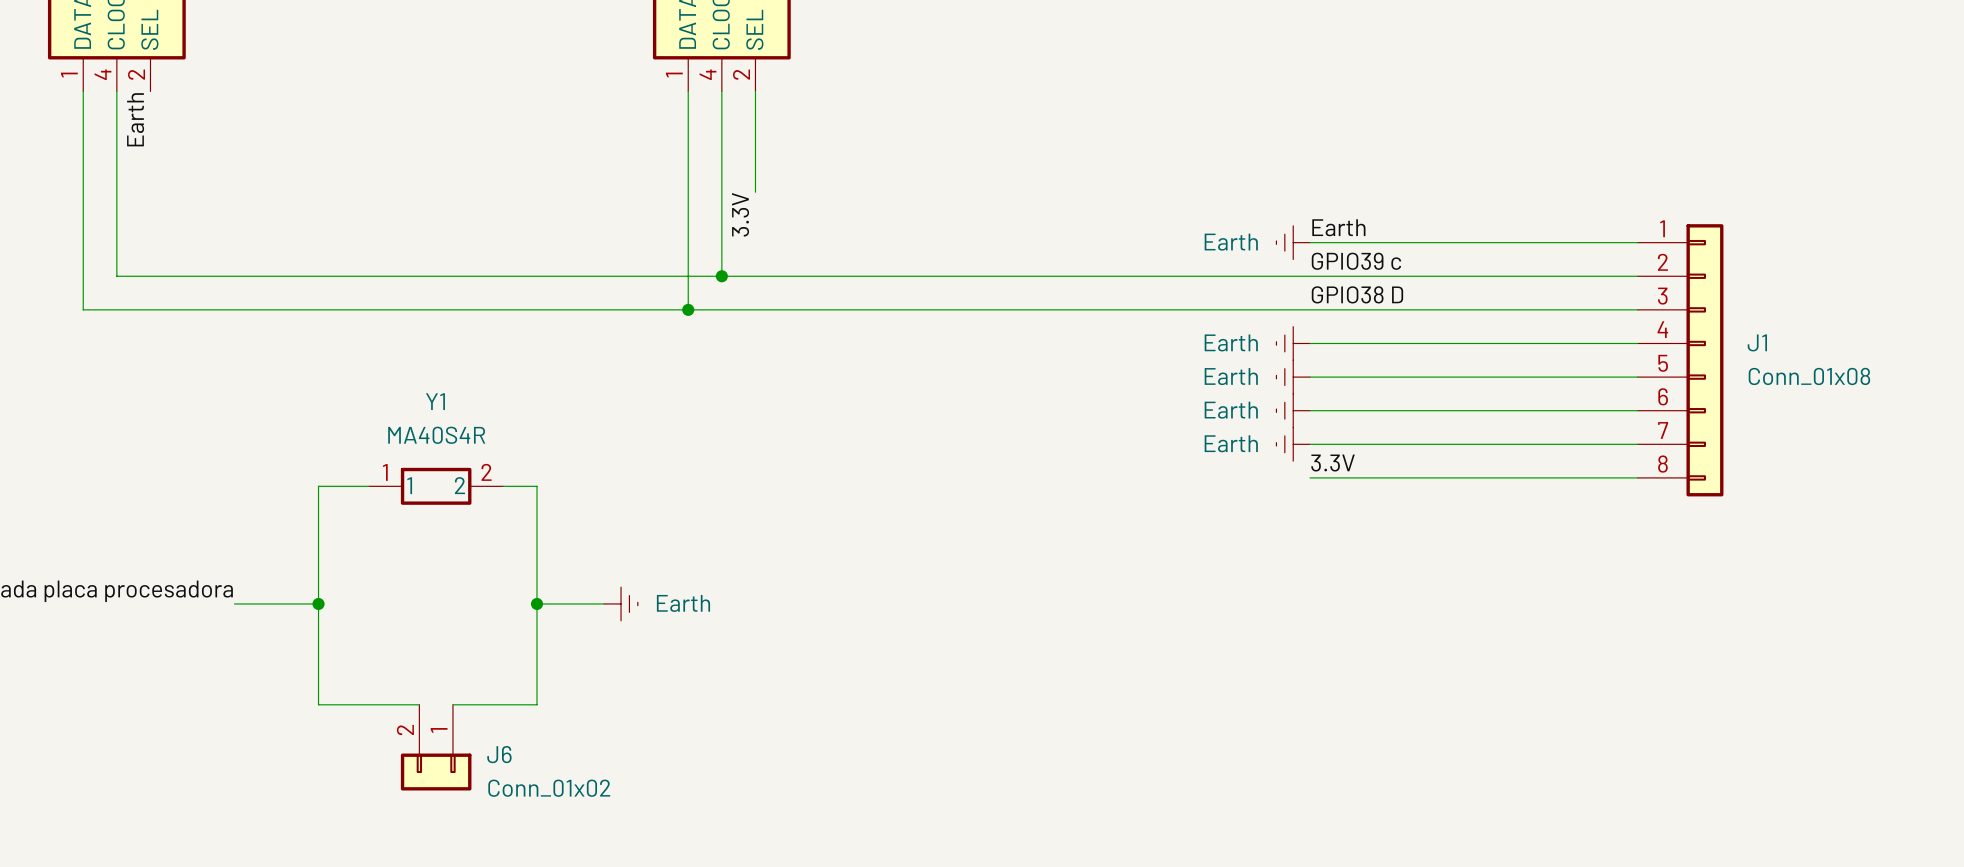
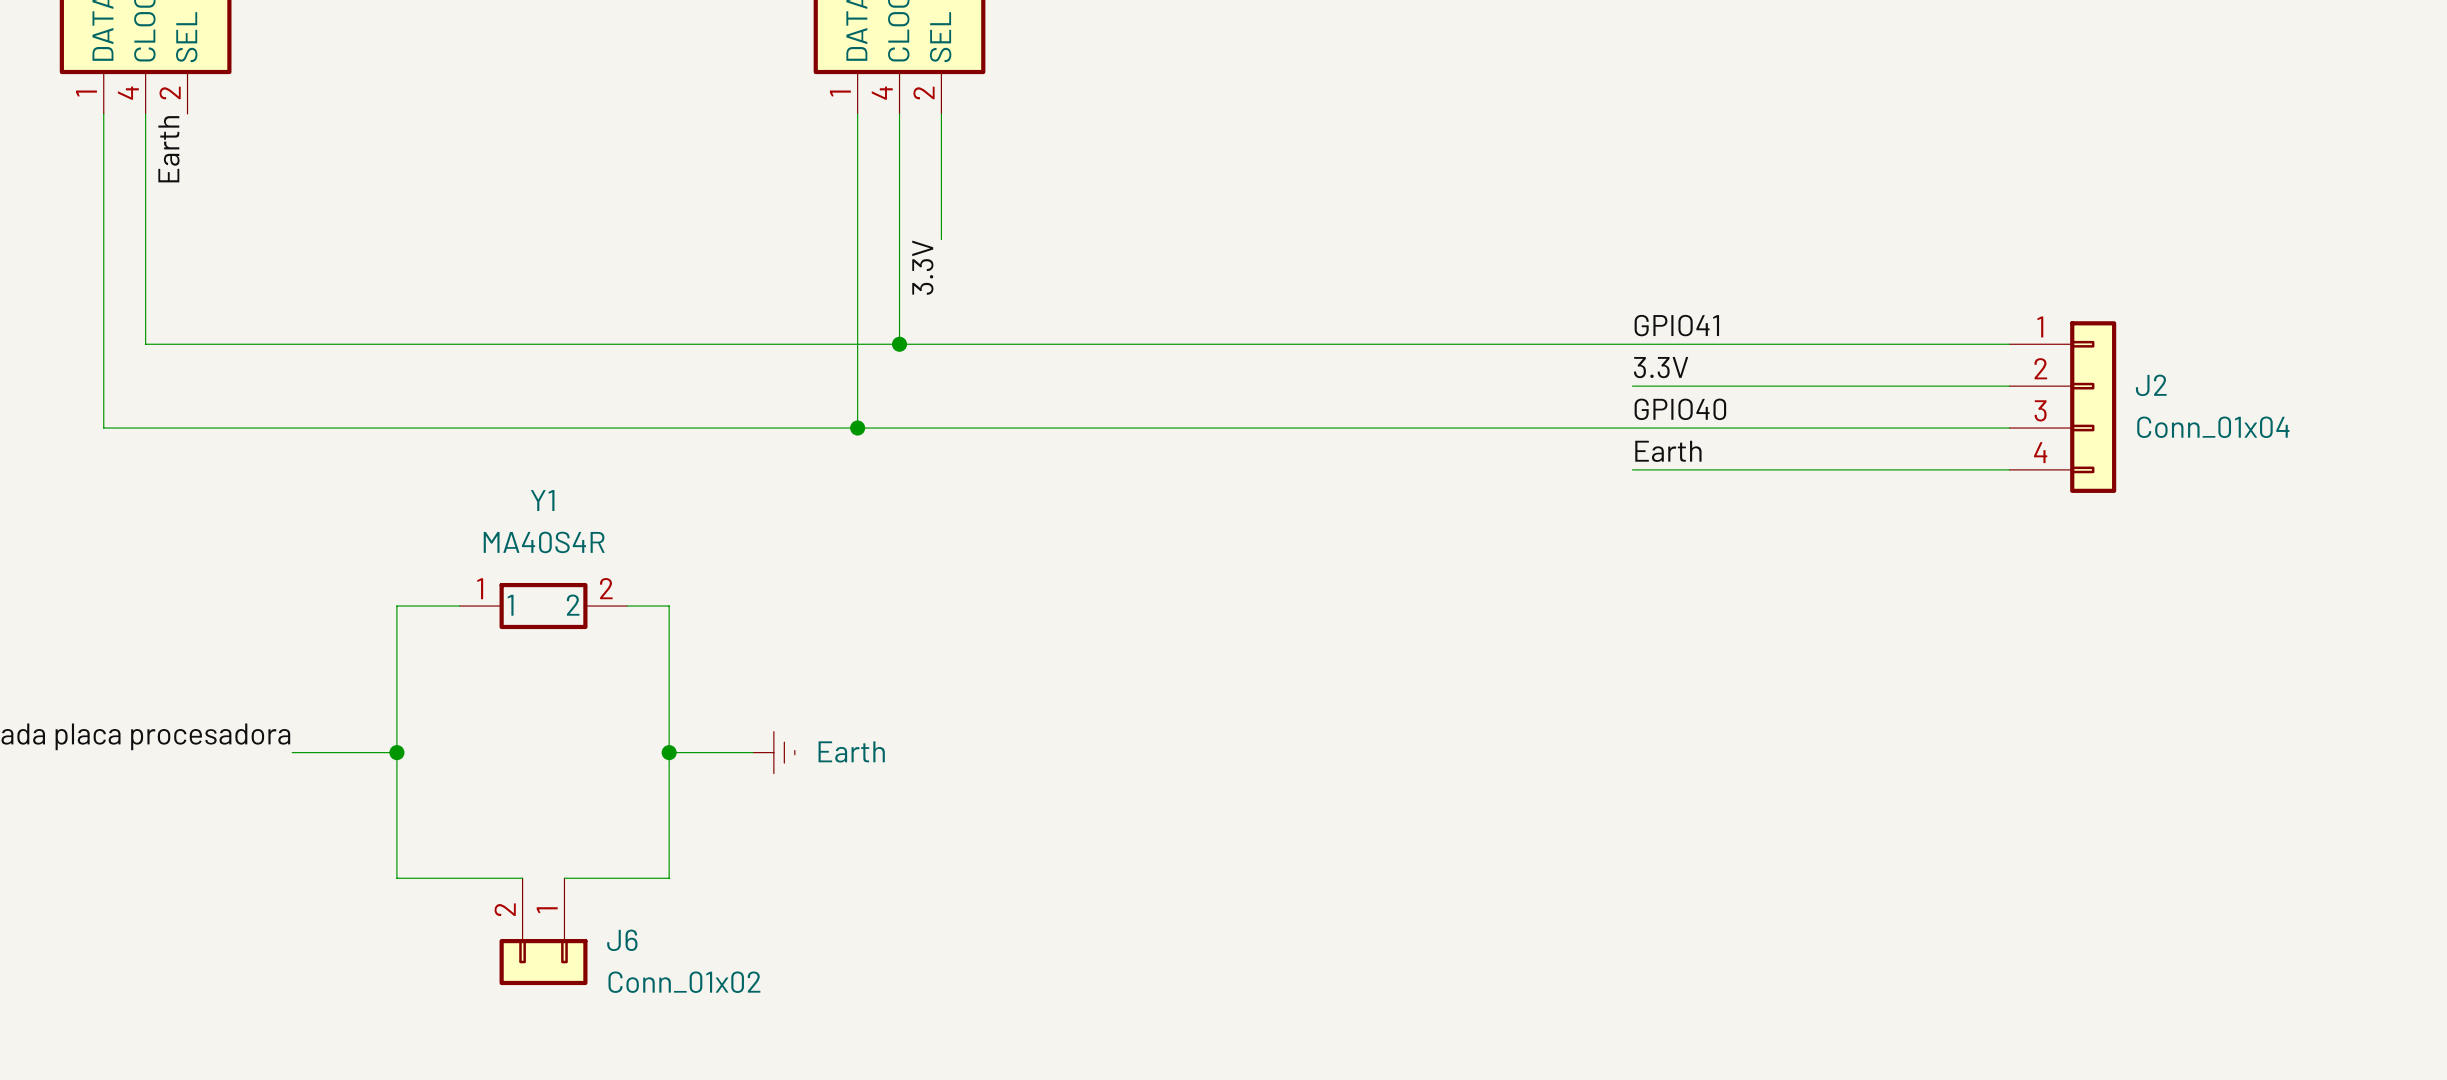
label position: Earth (1338, 227) -> Earth (1668, 451)
power symbol: Earth (1293, 242) -> none
wire: (1310, 242) (1637, 242) -> none
label: GPIO39 c (1356, 261) -> GPIO41 (1676, 325)
label: GPIO38 D (1357, 294) -> 3.3V (1661, 367)
wire: (83, 309) (1310, 309) -> (103, 386) (103, 428) (1632, 428)
wire: none -> (857, 386) (857, 428)
junction position: (688, 309) -> (857, 428)
J2: none -> Conn_01x04 (2062, 407)
label: none -> GPIO40 (1680, 409)
power symbol: Earth (1293, 343) -> none
J1: Conn_01x08 (1680, 360) -> none
power symbol: Earth (1293, 377) -> none
power symbol: Earth (1293, 410) -> none
wire: (1310, 410) (1637, 410) -> none
power symbol: Earth (1293, 444) -> none
wire: (1310, 444) (1637, 444) -> none
label: 3.3V (1333, 463) -> none
wire: (1310, 477) (1637, 477) -> none

